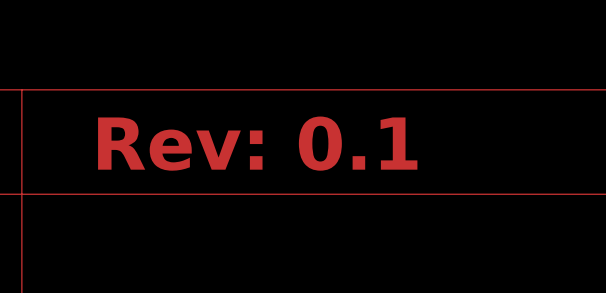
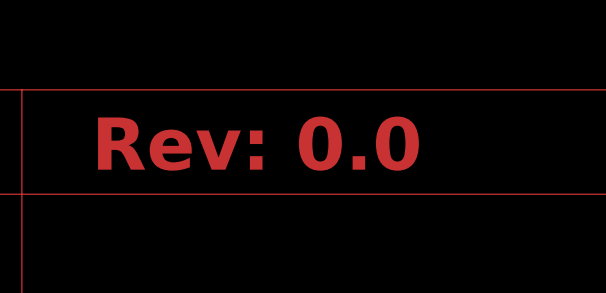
title block: Rev: 0.1 (257, 143) -> Rev: 0.0 (258, 143)

